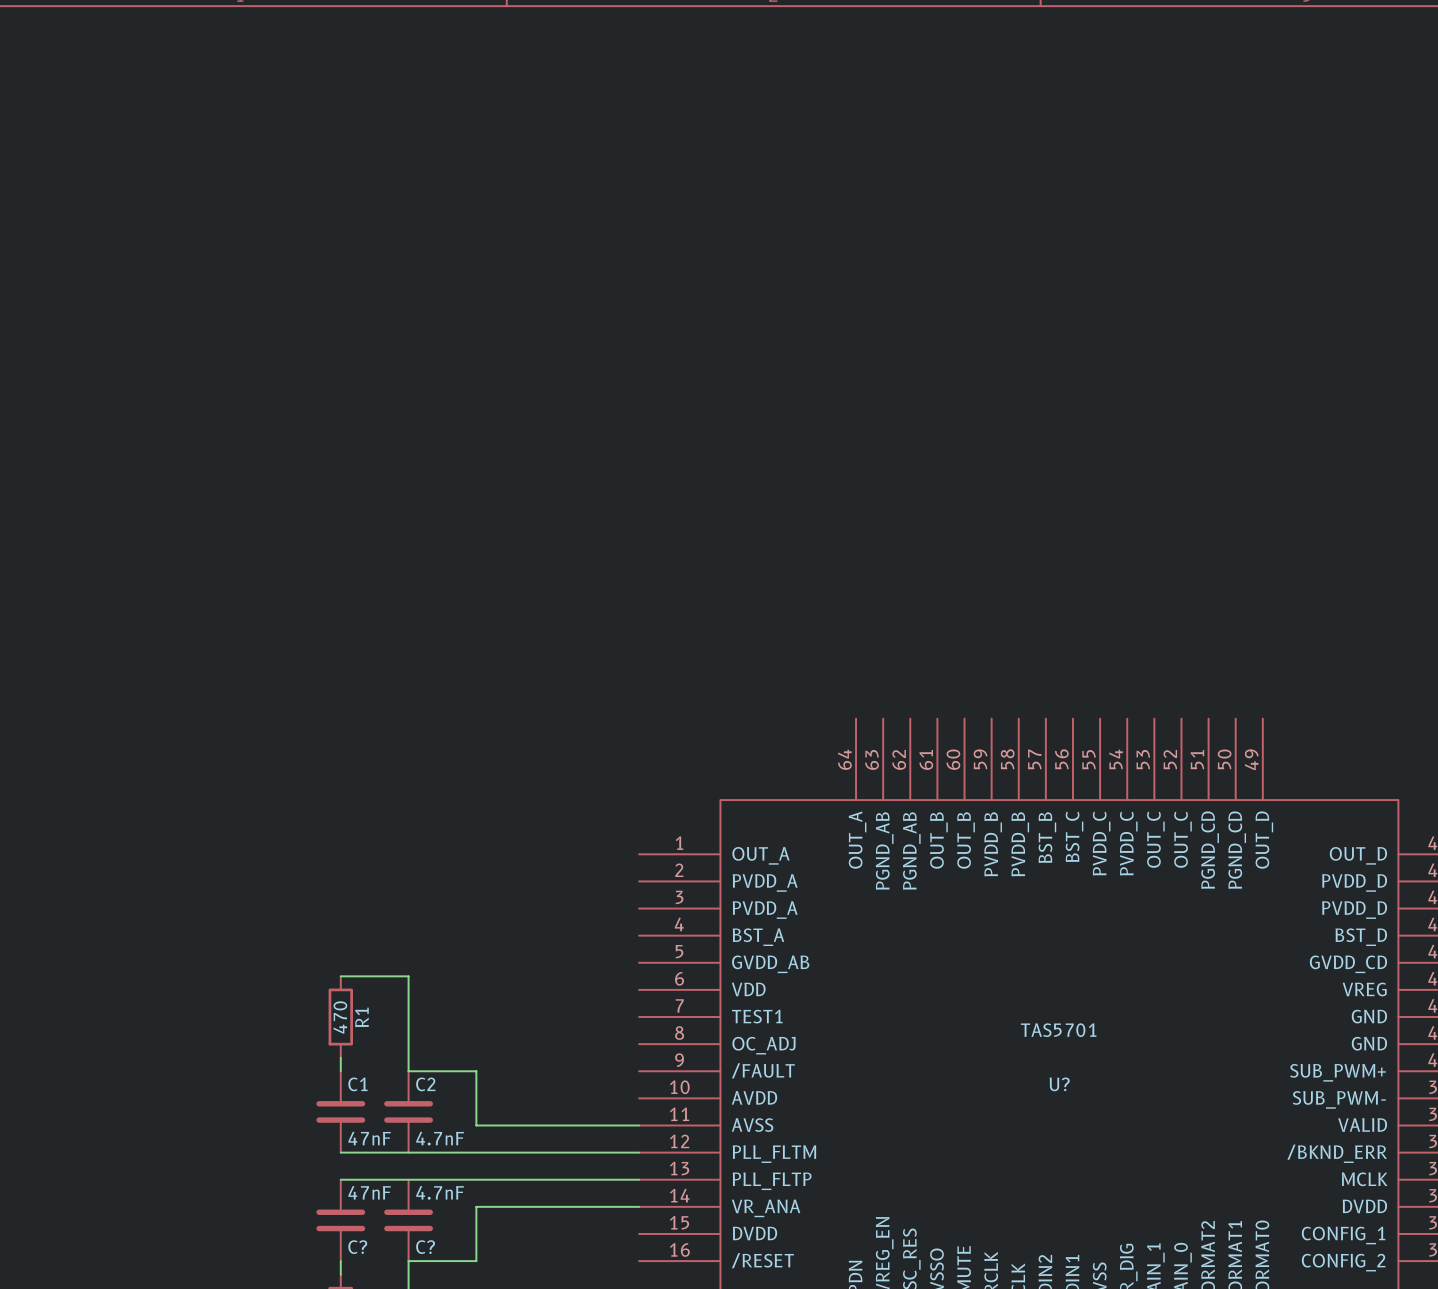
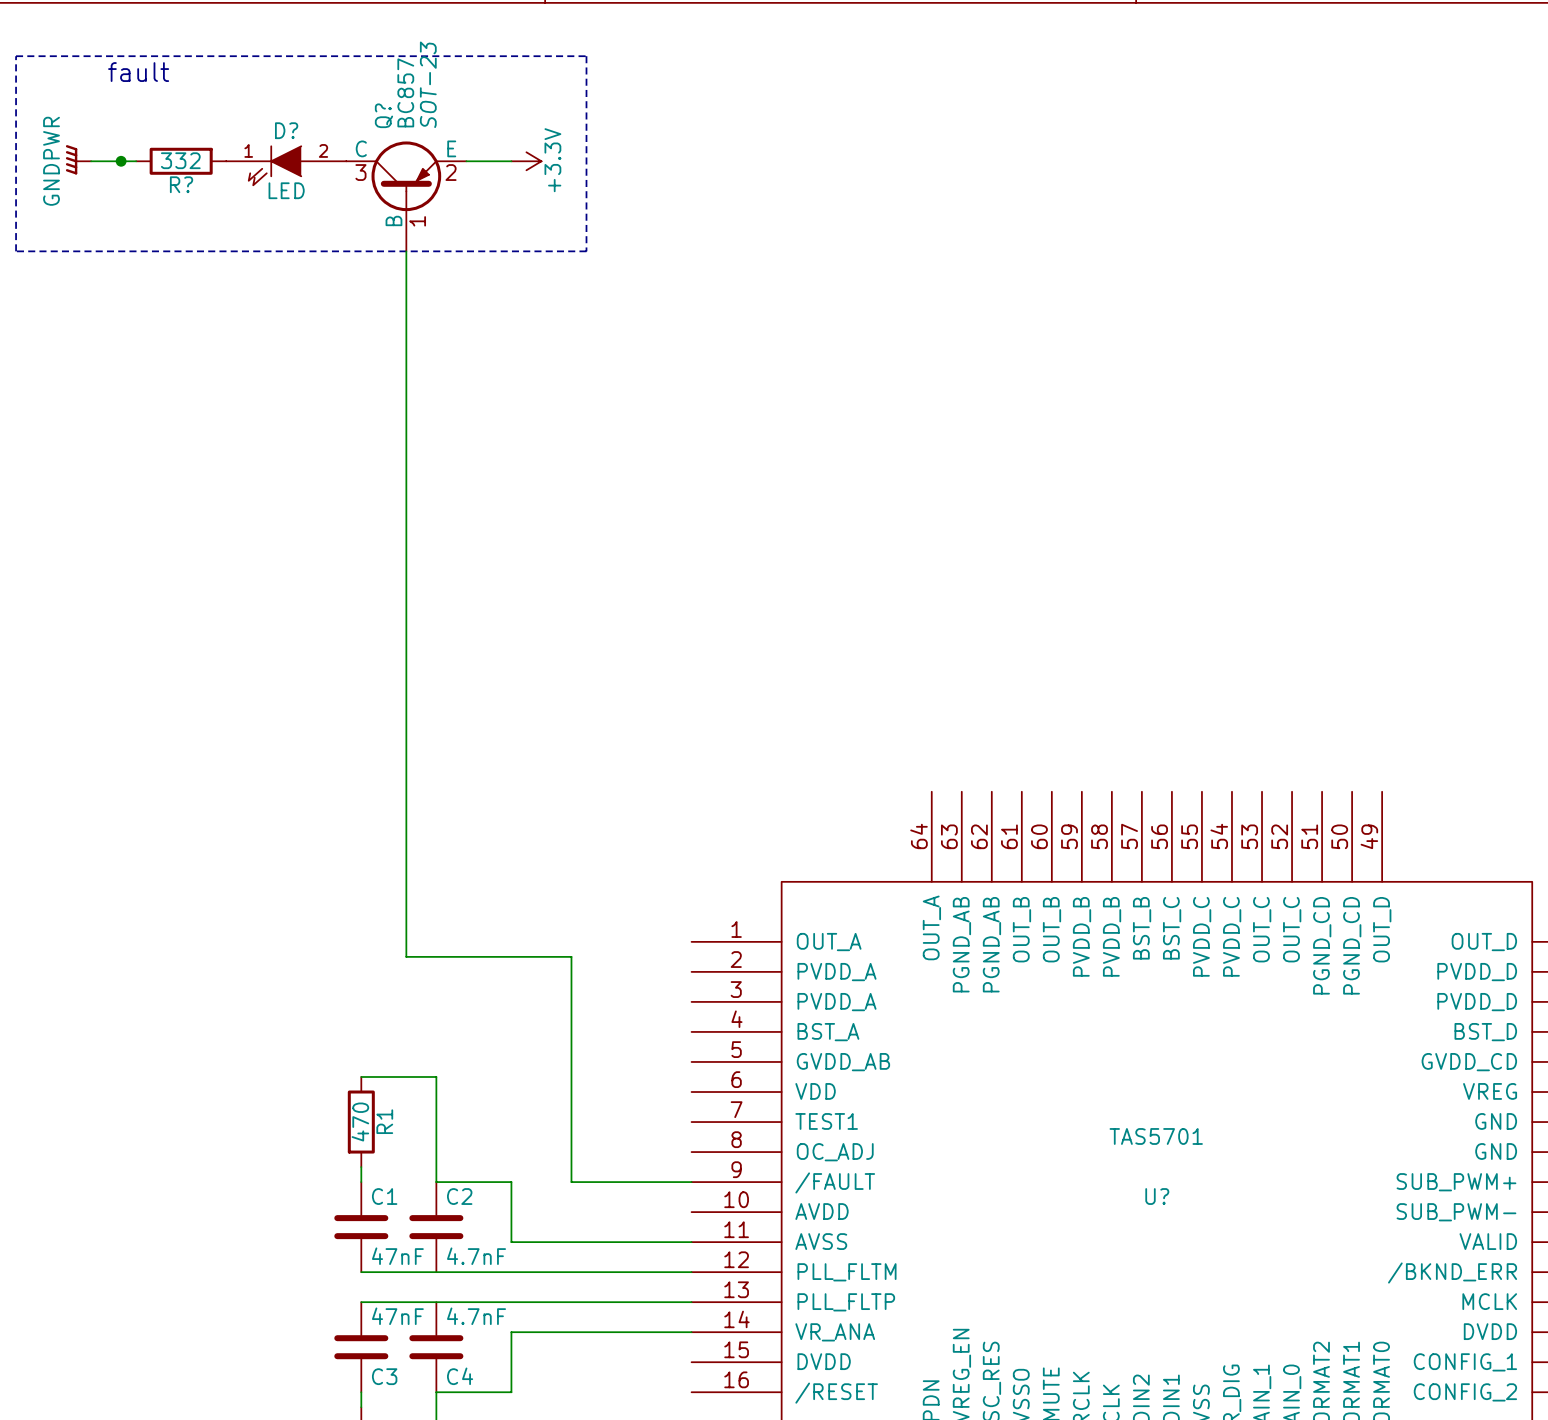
line: none -> (16, 56) (16, 251) (586, 251) (586, 56) (16, 56)
text: none -> fault (138, 72)
power symbol: none -> GNDPWR (78, 159)
wire: none -> (91, 161) (136, 161)
junction: none -> (121, 161)
R?: none -> 332 (181, 161)
wire: none -> (466, 161) (511, 161)
power symbol: none -> +3.3V (526, 161)
D?: none -> LED (286, 165)
Q?: none -> BC857 (406, 196)
wire: none -> (406, 251) (406, 956) (571, 956) (571, 1182) (691, 1182)
C? name: C? (357, 1247) -> C3 (384, 1376)
C? name: C? (425, 1247) -> C4 (460, 1376)

